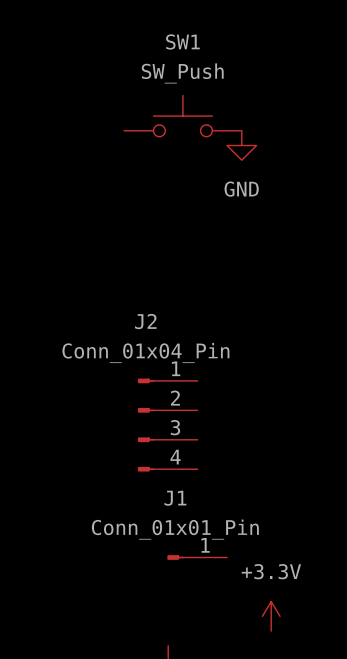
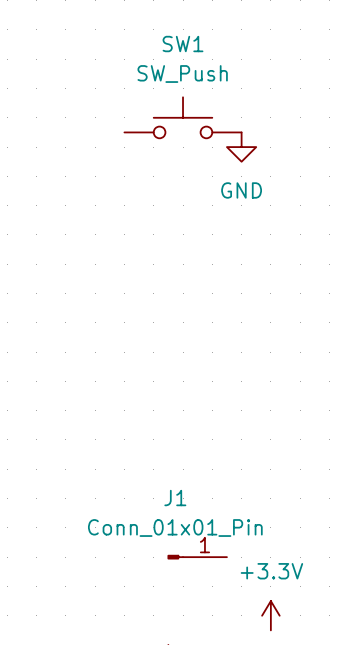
J2: Conn_01x04_Pin (167, 425) -> none

